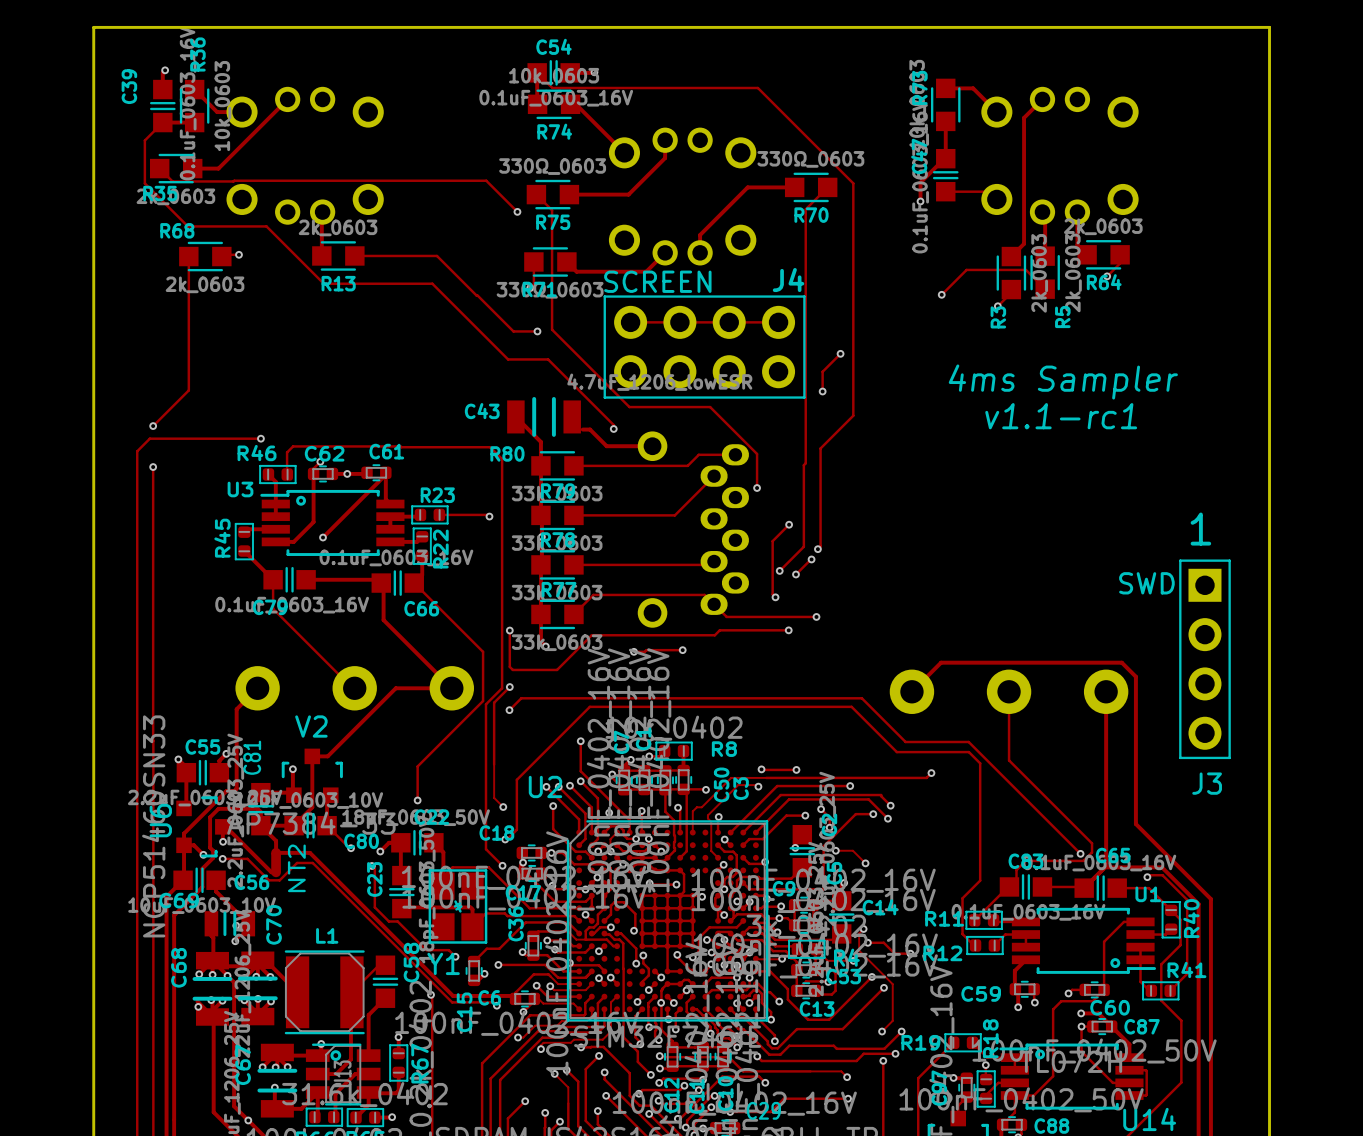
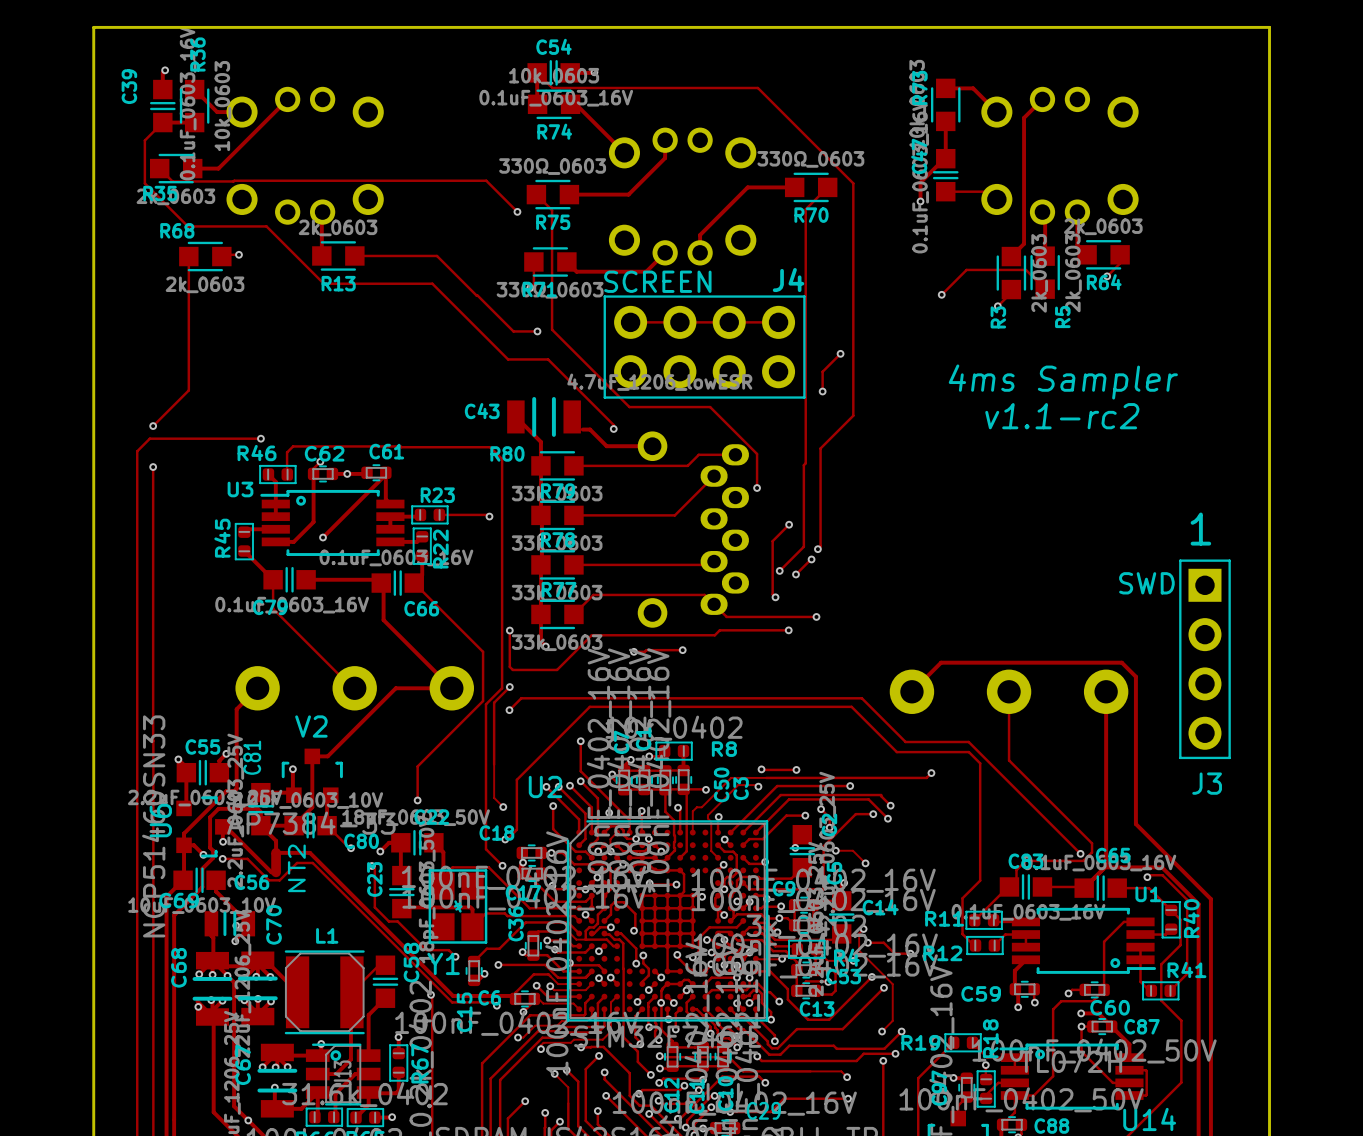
text: v1.1-rc1 (1061, 416) -> v1.1-rc2 (1062, 416)

